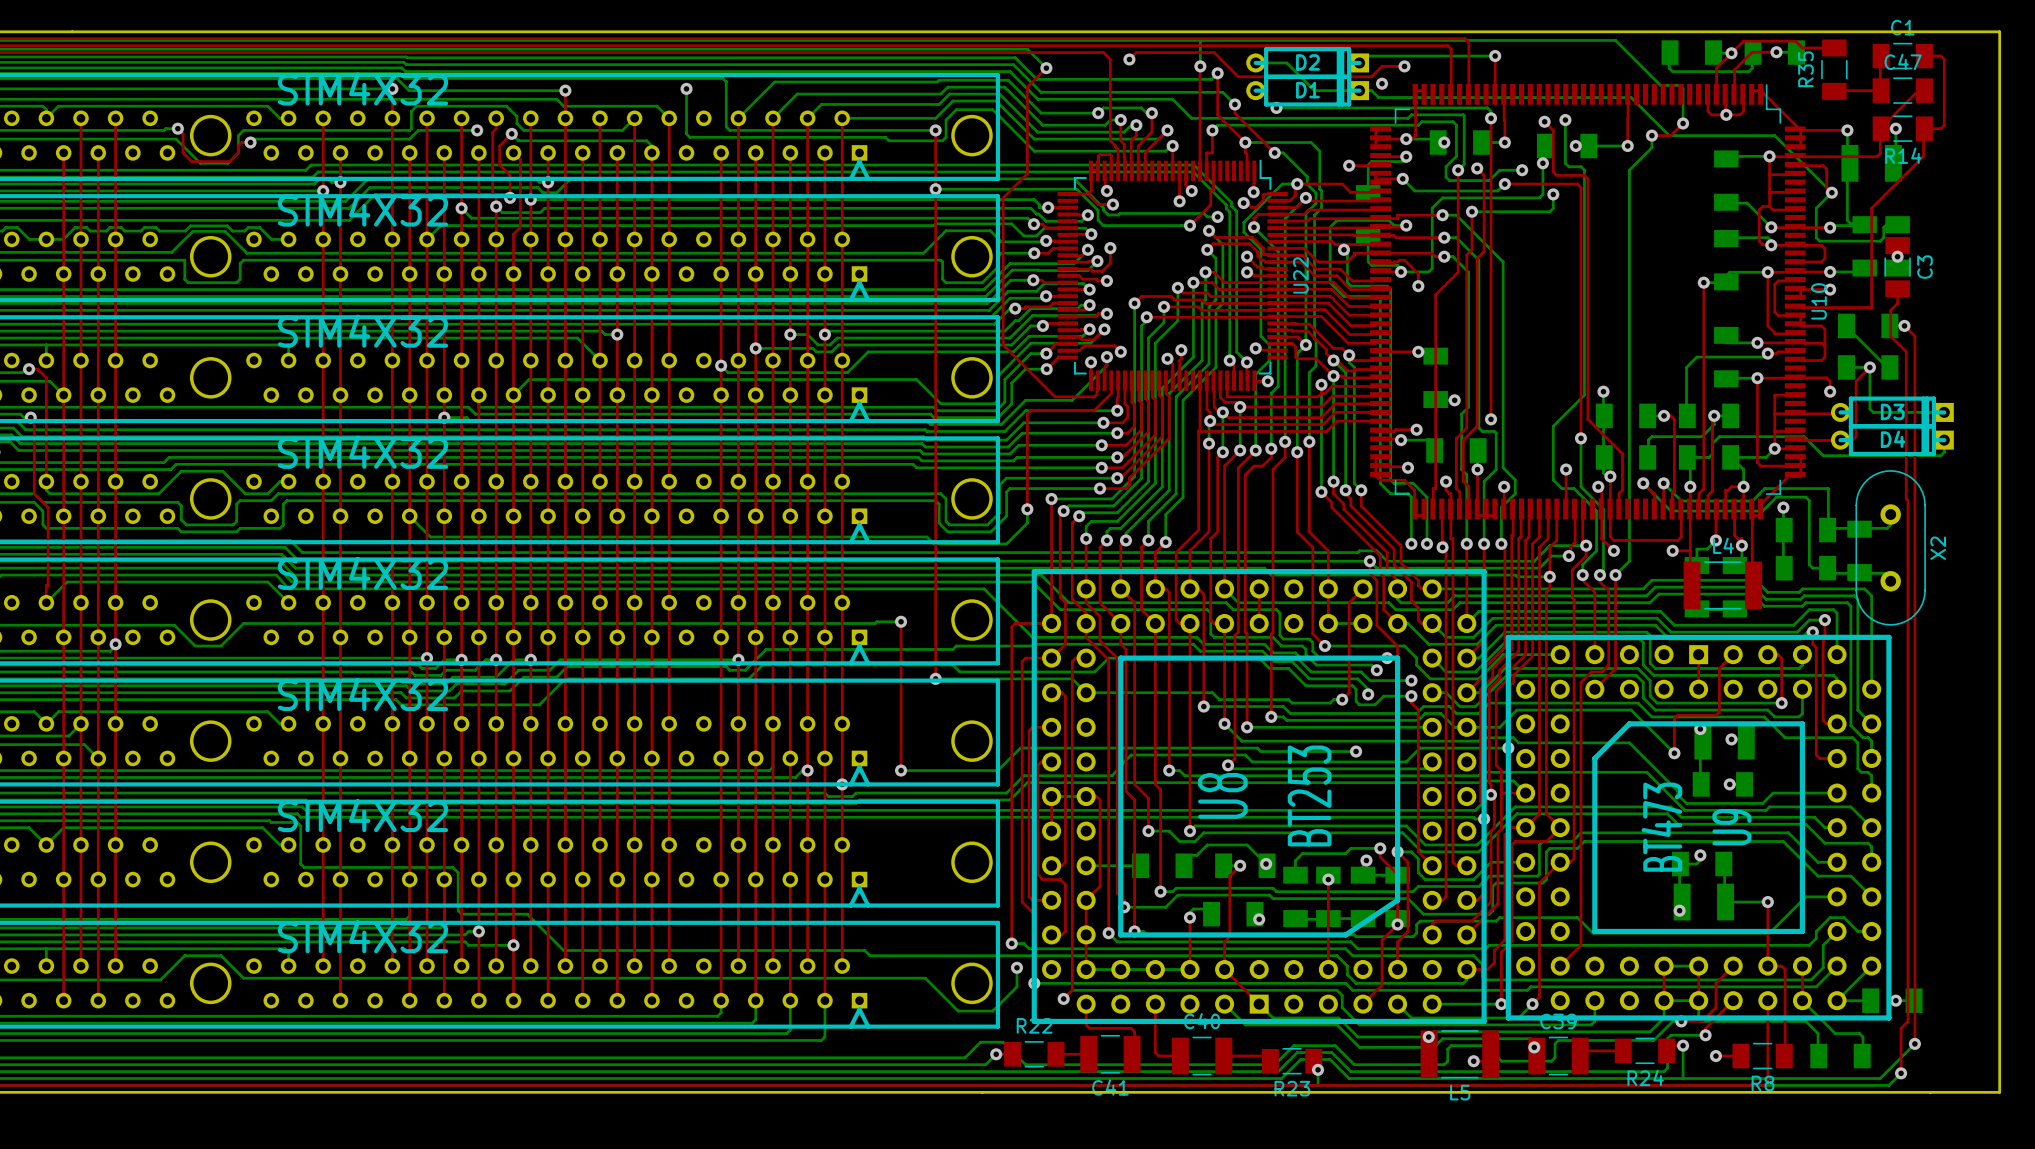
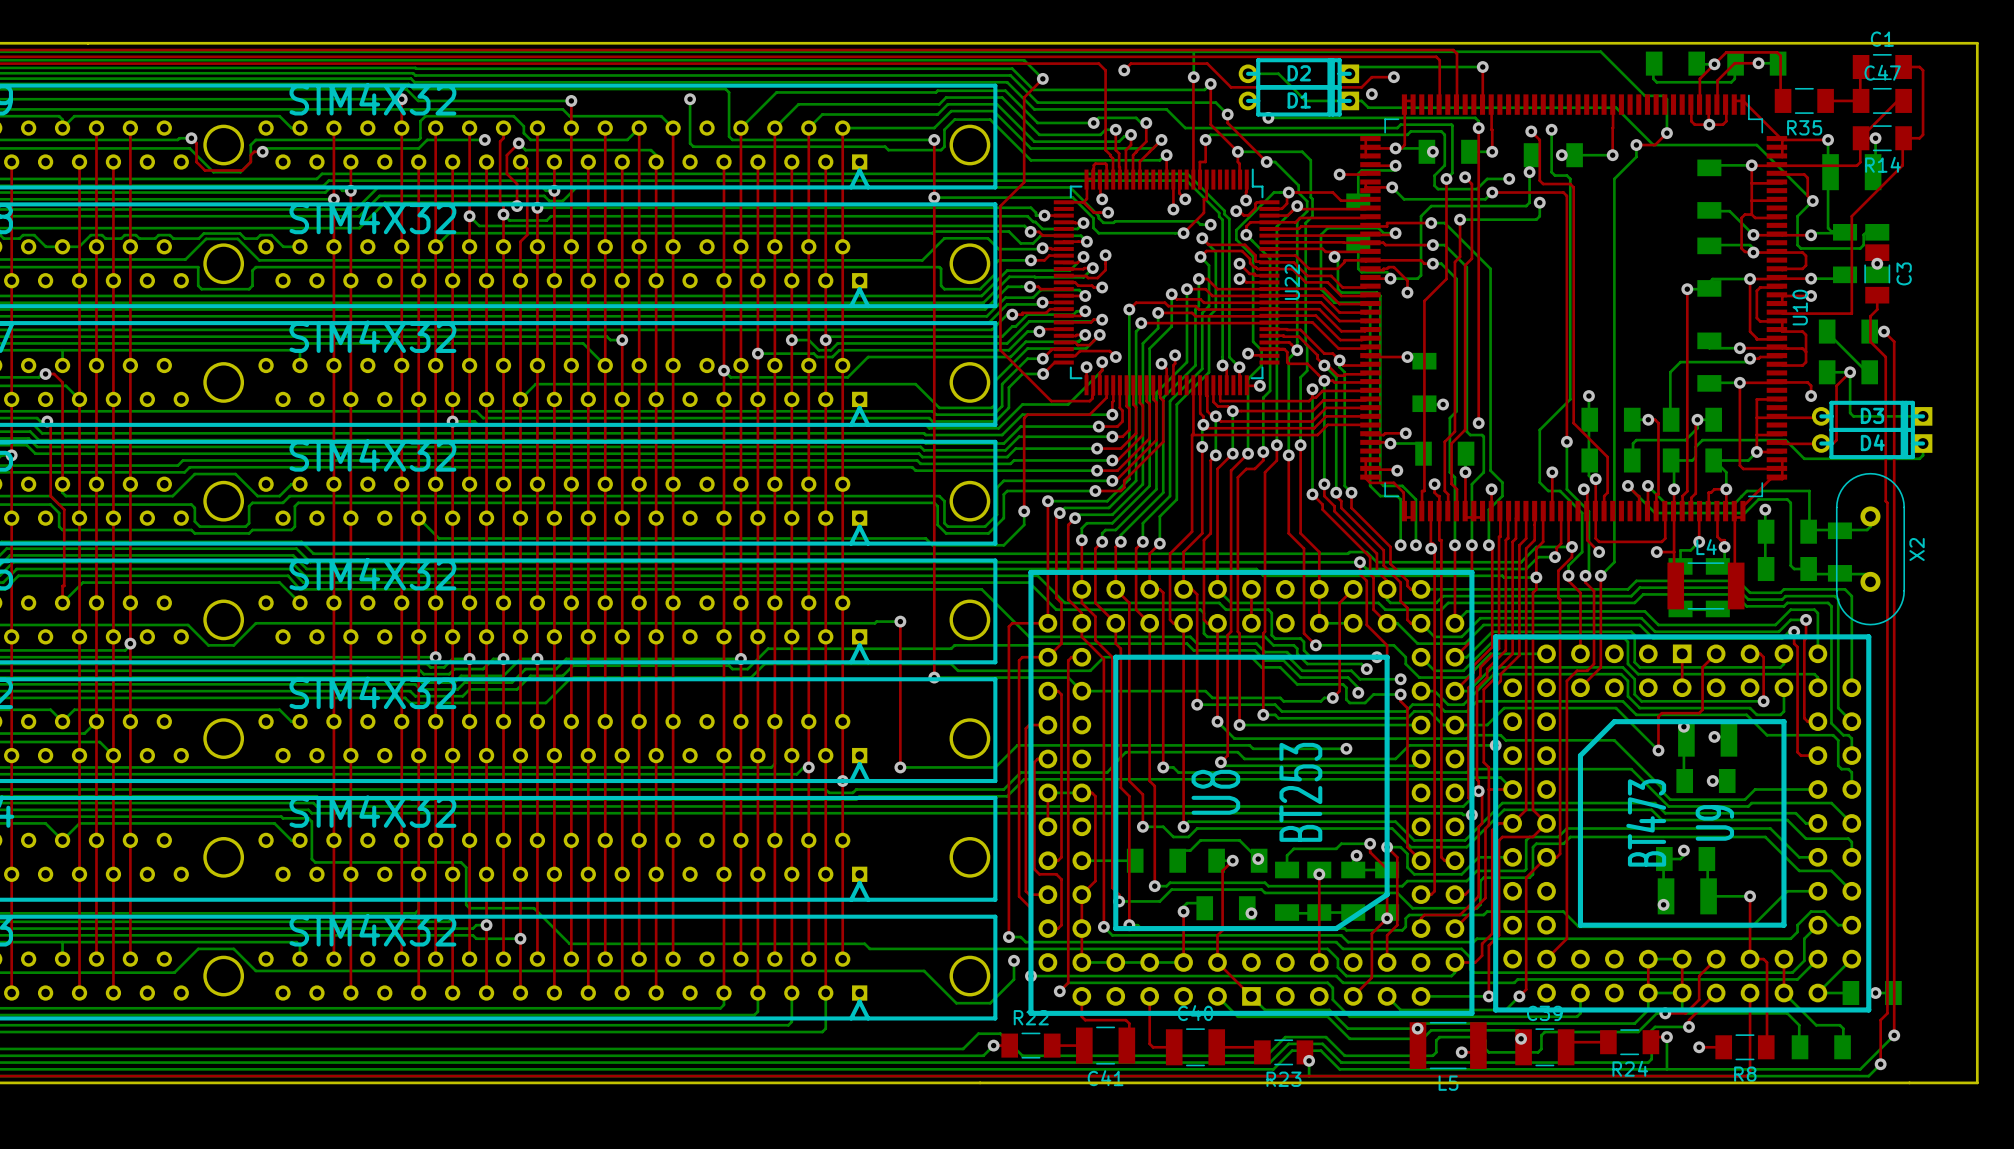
top track: (1798, 44) (1802, 47) (1834, 47) -> (1780, 55) (1780, 100) (1782, 100)
R35 name position: R35 (1805, 69) -> R35 (1804, 127)
R35 rotation: 0° (1834, 69) -> 90° clockwise (1804, 100)

